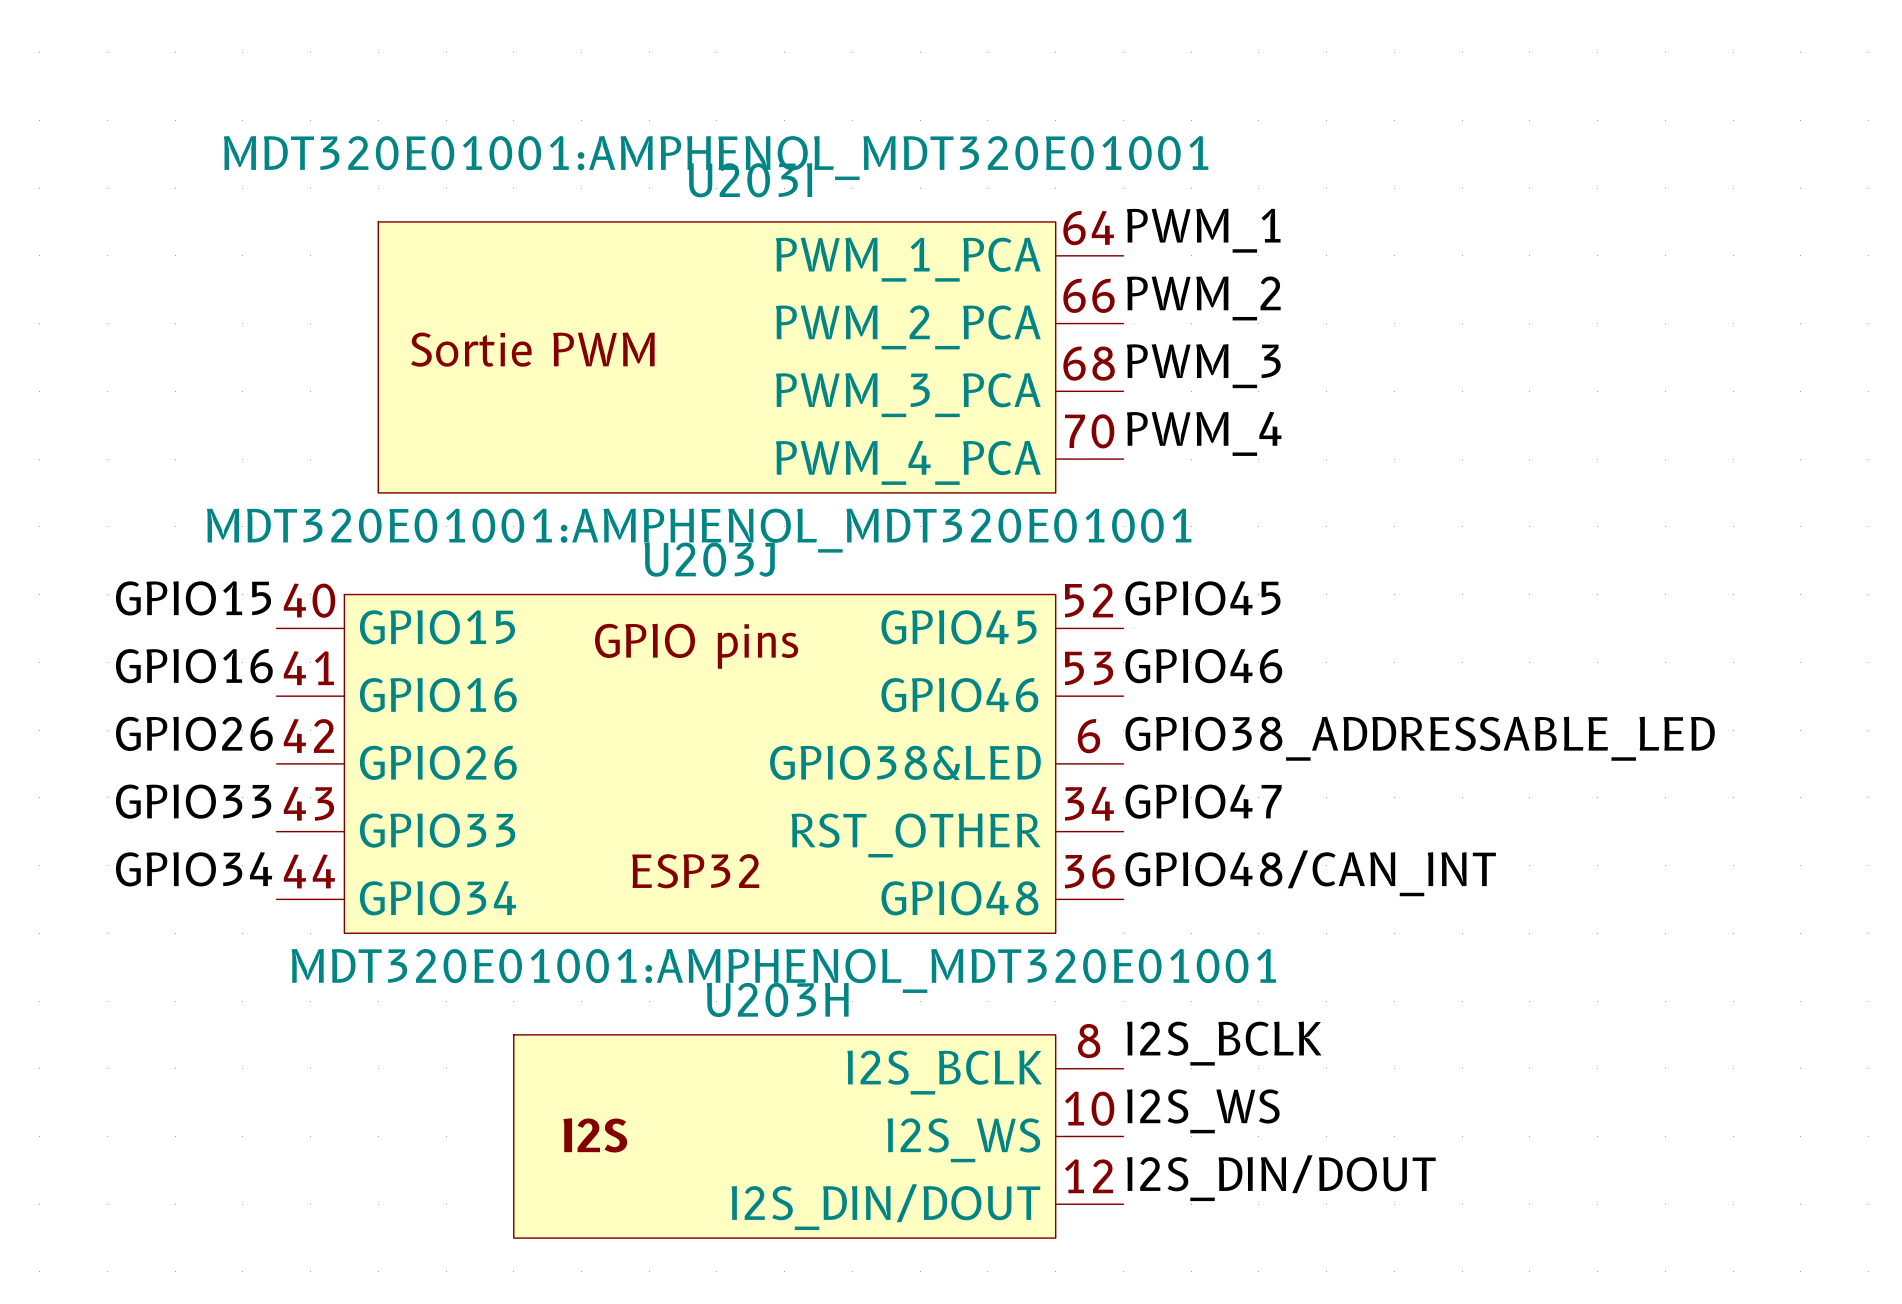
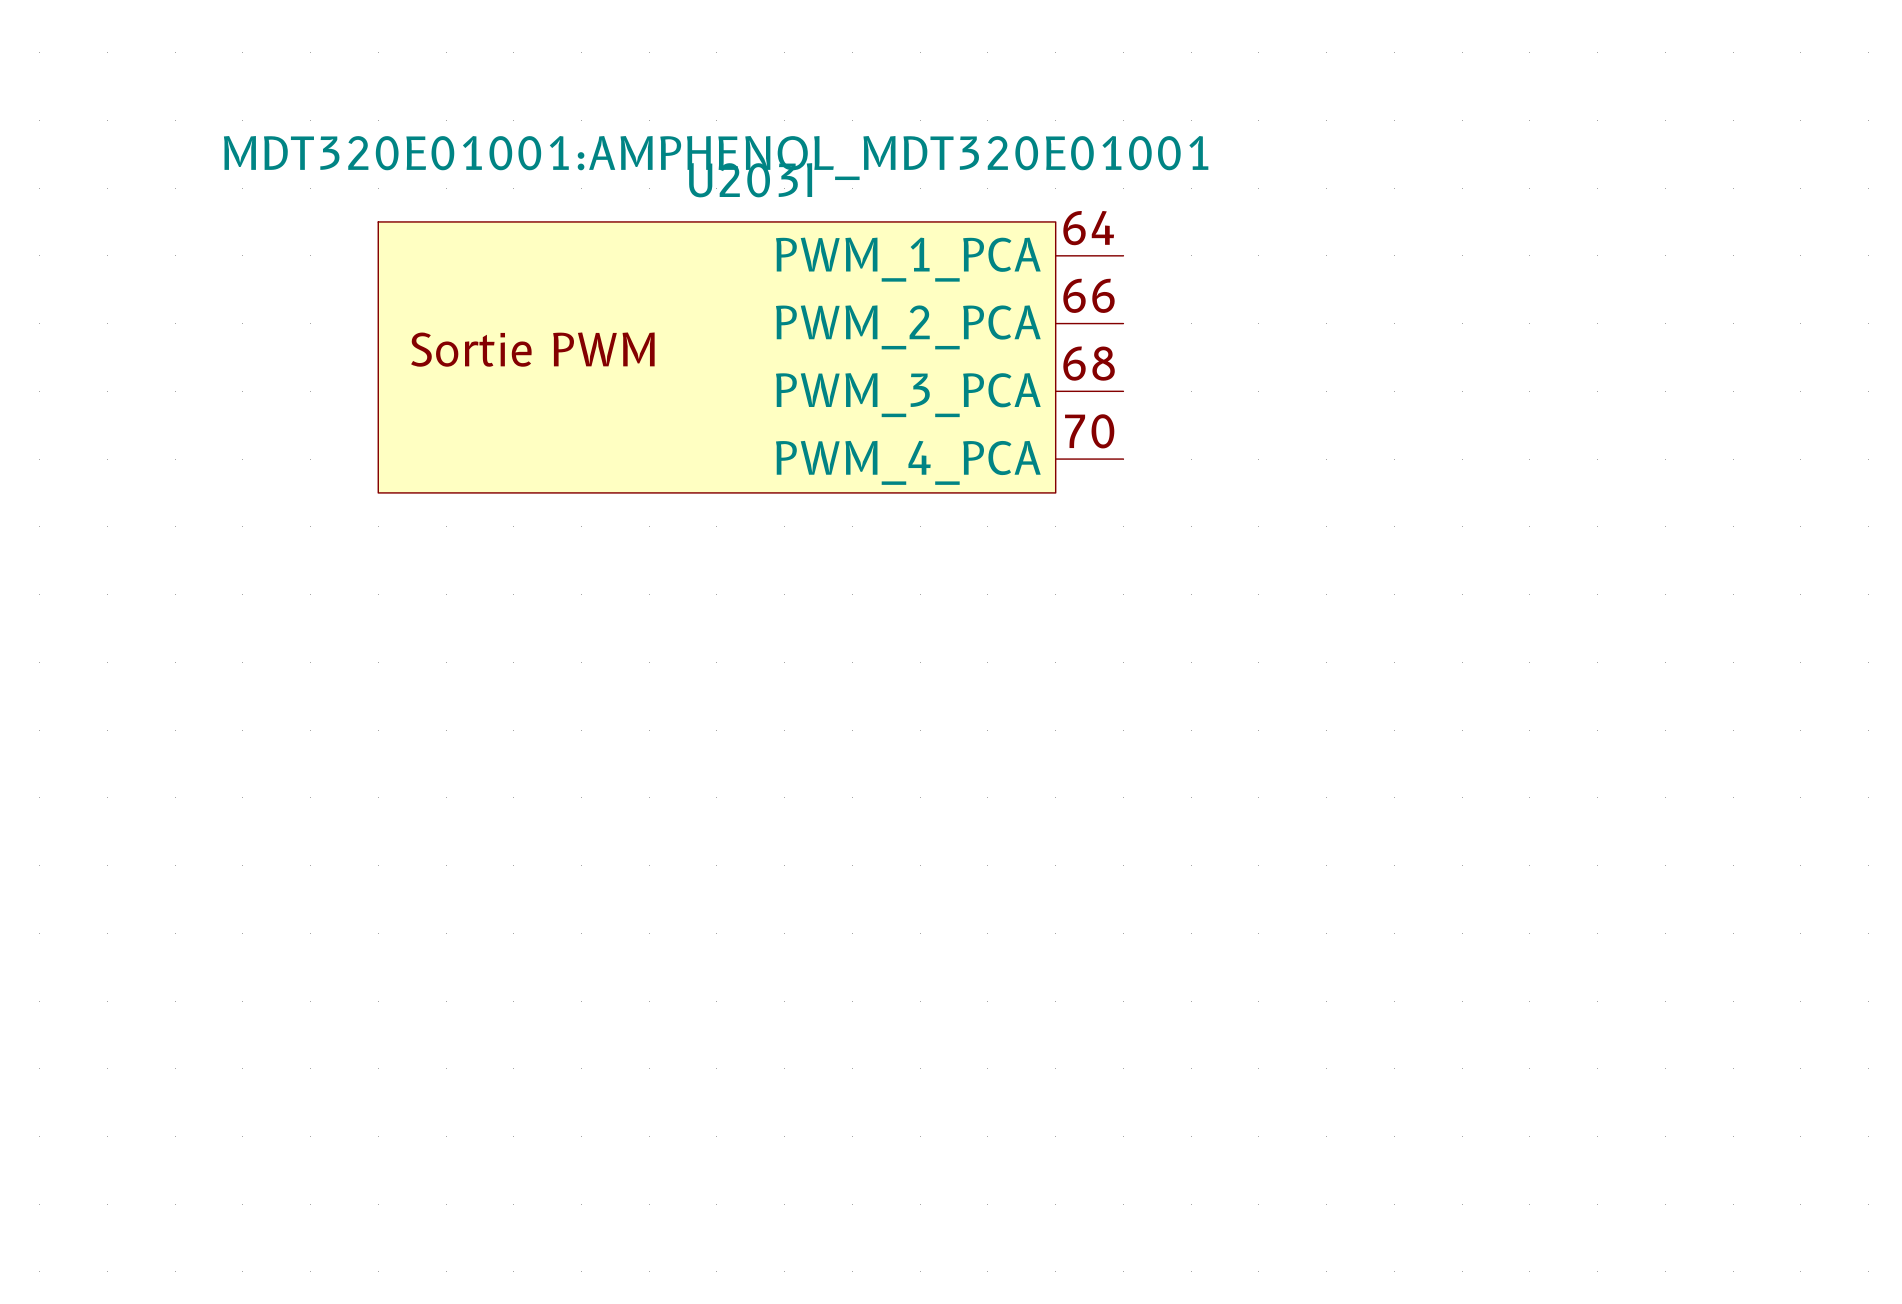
label: PWM_1 (1203, 230) -> none
label: PWM_2 (1203, 298) -> none
label: PWM_3 (1203, 366) -> none
label: PWM_4 (1204, 433) -> none
label: GPIO15 (193, 598) -> none
label: GPIO45 (1202, 598) -> none
label: GPIO16 (194, 666) -> none
label: GPIO46 (1203, 666) -> none
label: GPIO26 (194, 733) -> none
label: GPIO38_ADDRESSABLE_LED (1420, 738) -> none
U203J: (700, 763) -> none
label: GPIO33 (193, 801) -> none
label: GPIO47 (1203, 801) -> none
label: GPIO34 (194, 869) -> none
label: GPIO48/CAN_INT (1310, 873) -> none
label: I2S_BCLK (1224, 1043) -> none
label: I2S_WS (1203, 1111) -> none
U203H: (818, 1136) -> none
label: I2S_DIN/DOUT (1281, 1178) -> none

